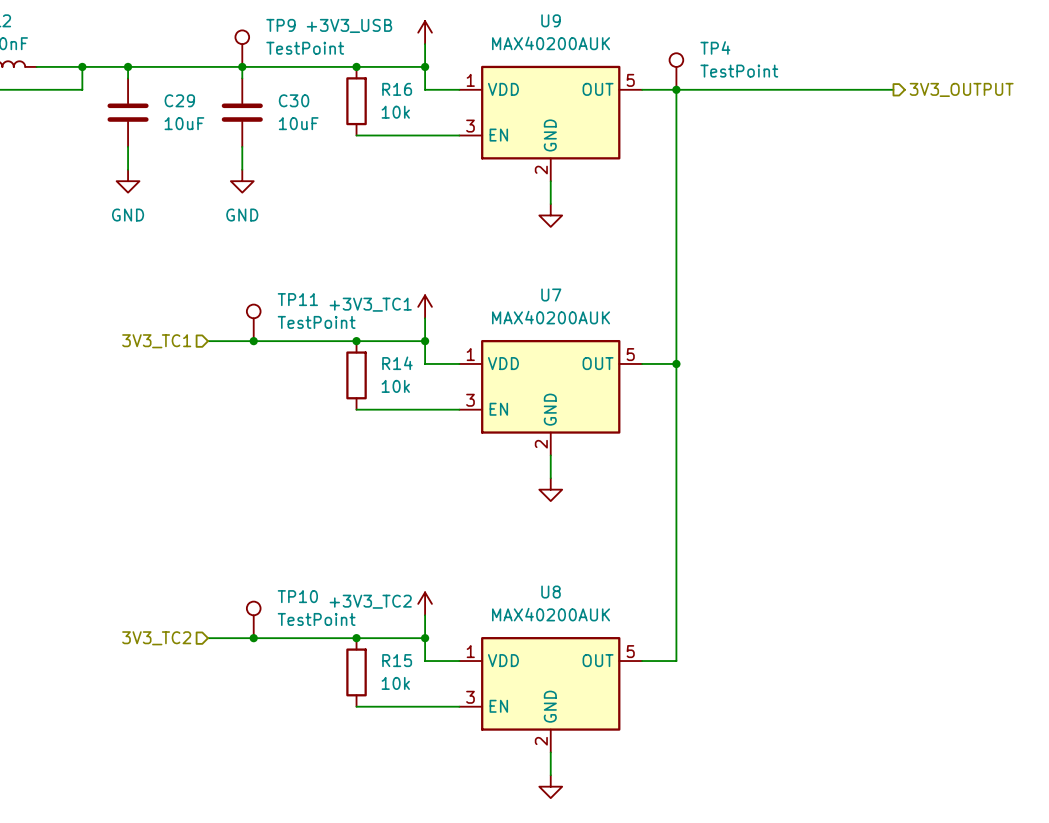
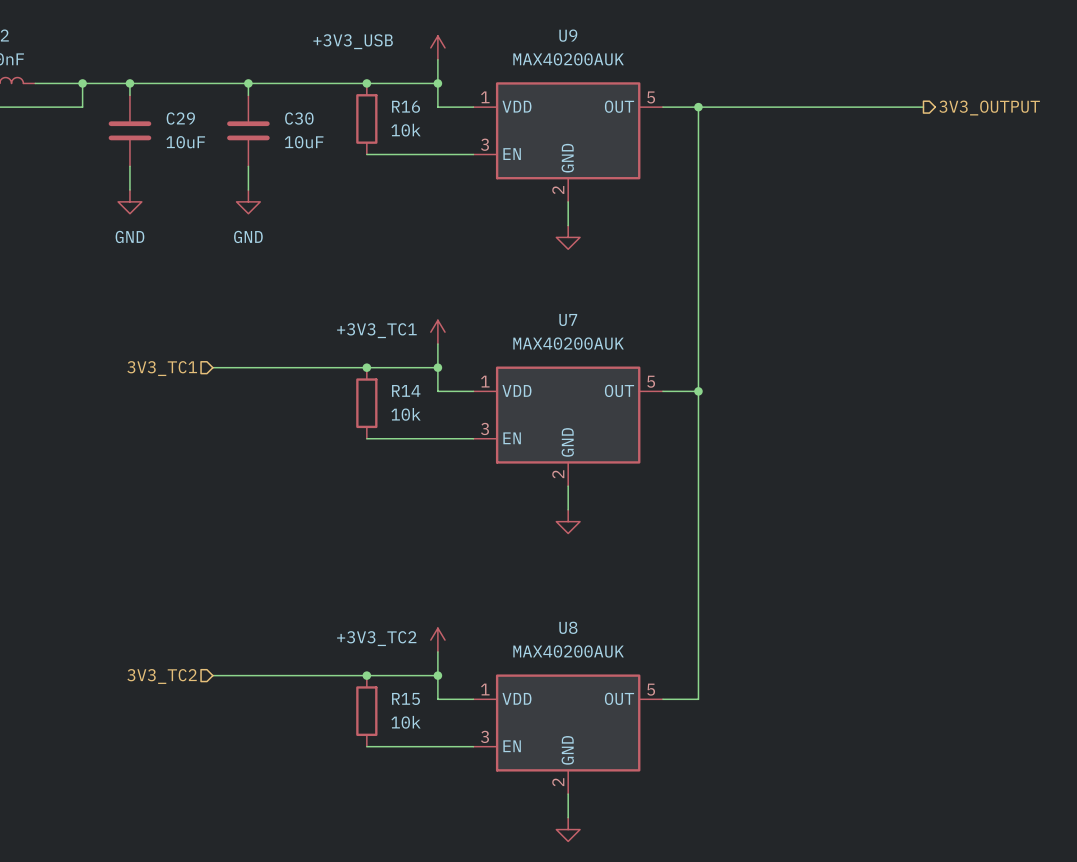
TP9: TestPoint (242, 48) -> none
TP4: TestPoint (676, 71) -> none
TP11: TestPoint (253, 322) -> none
junction: (253, 341) -> none
TP10: TestPoint (253, 619) -> none
junction: (253, 638) -> none

